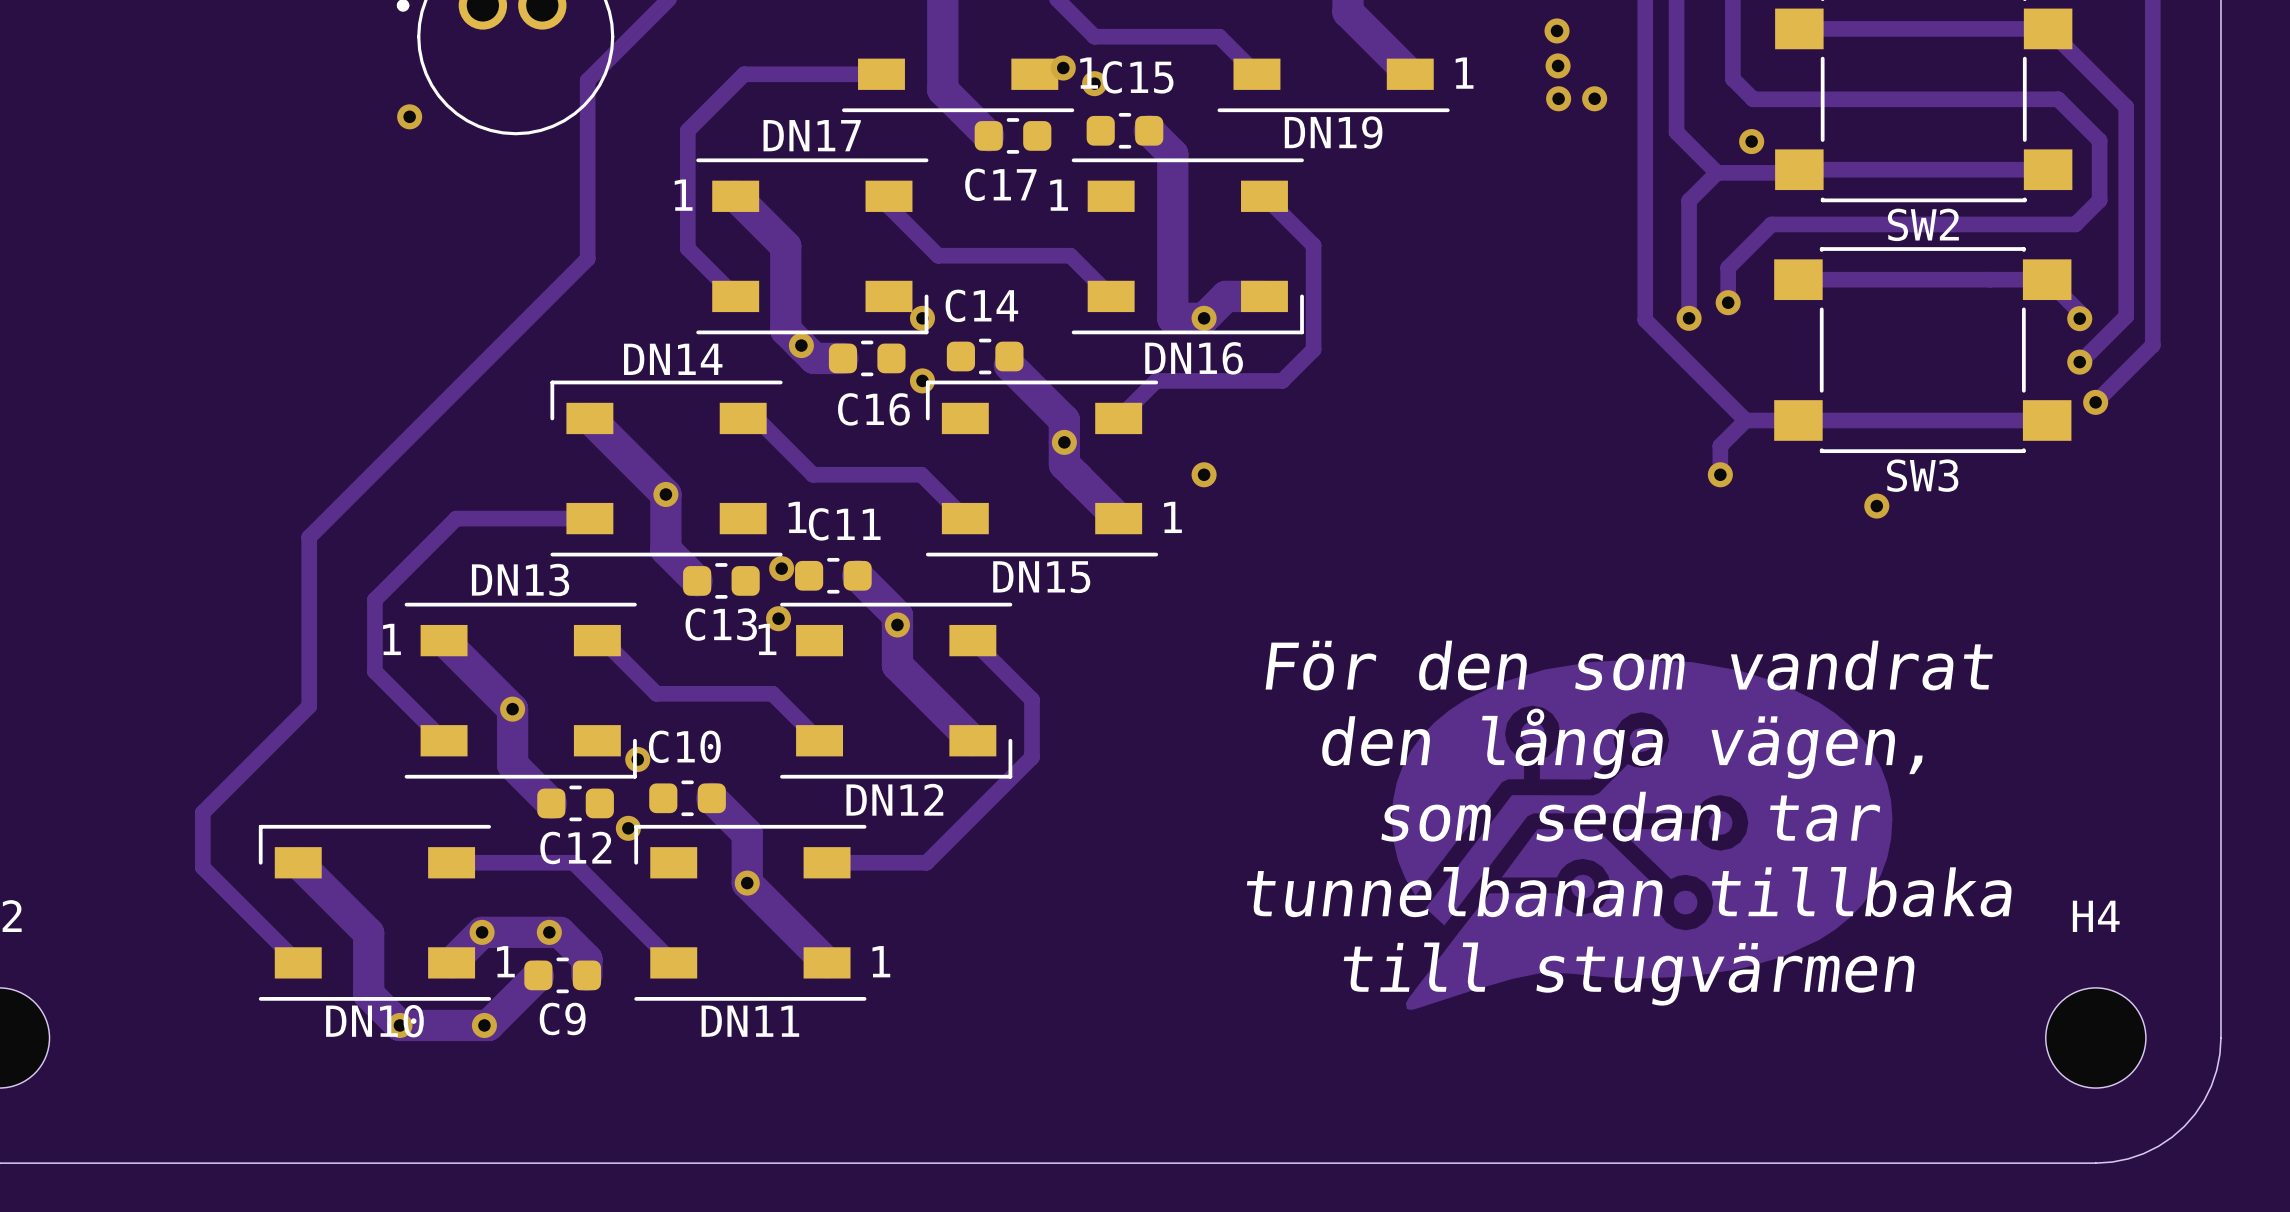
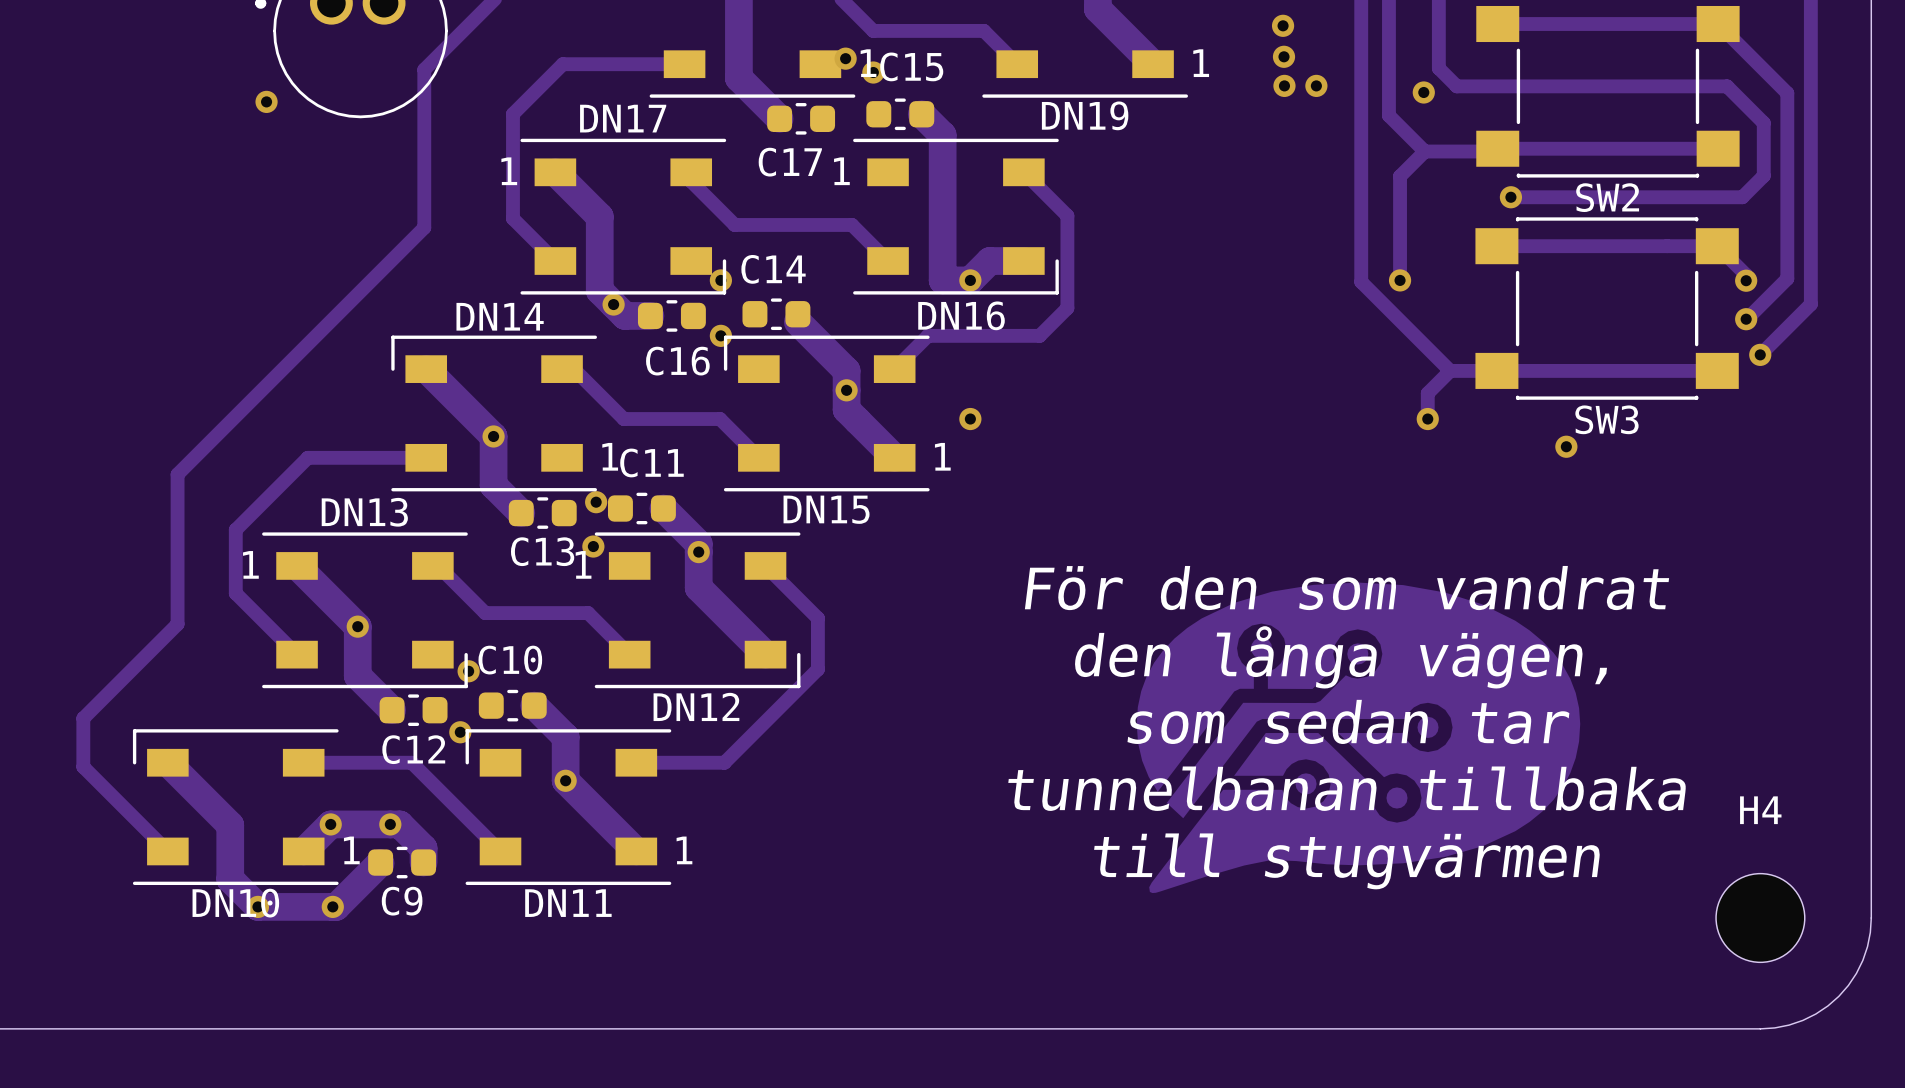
via position: (1751, 141) -> (1423, 92)
track: (1814, 224) (1771, 224) (1728, 267) (1728, 302) -> none
via: none -> (1510, 197)
via: (1728, 302) -> none

